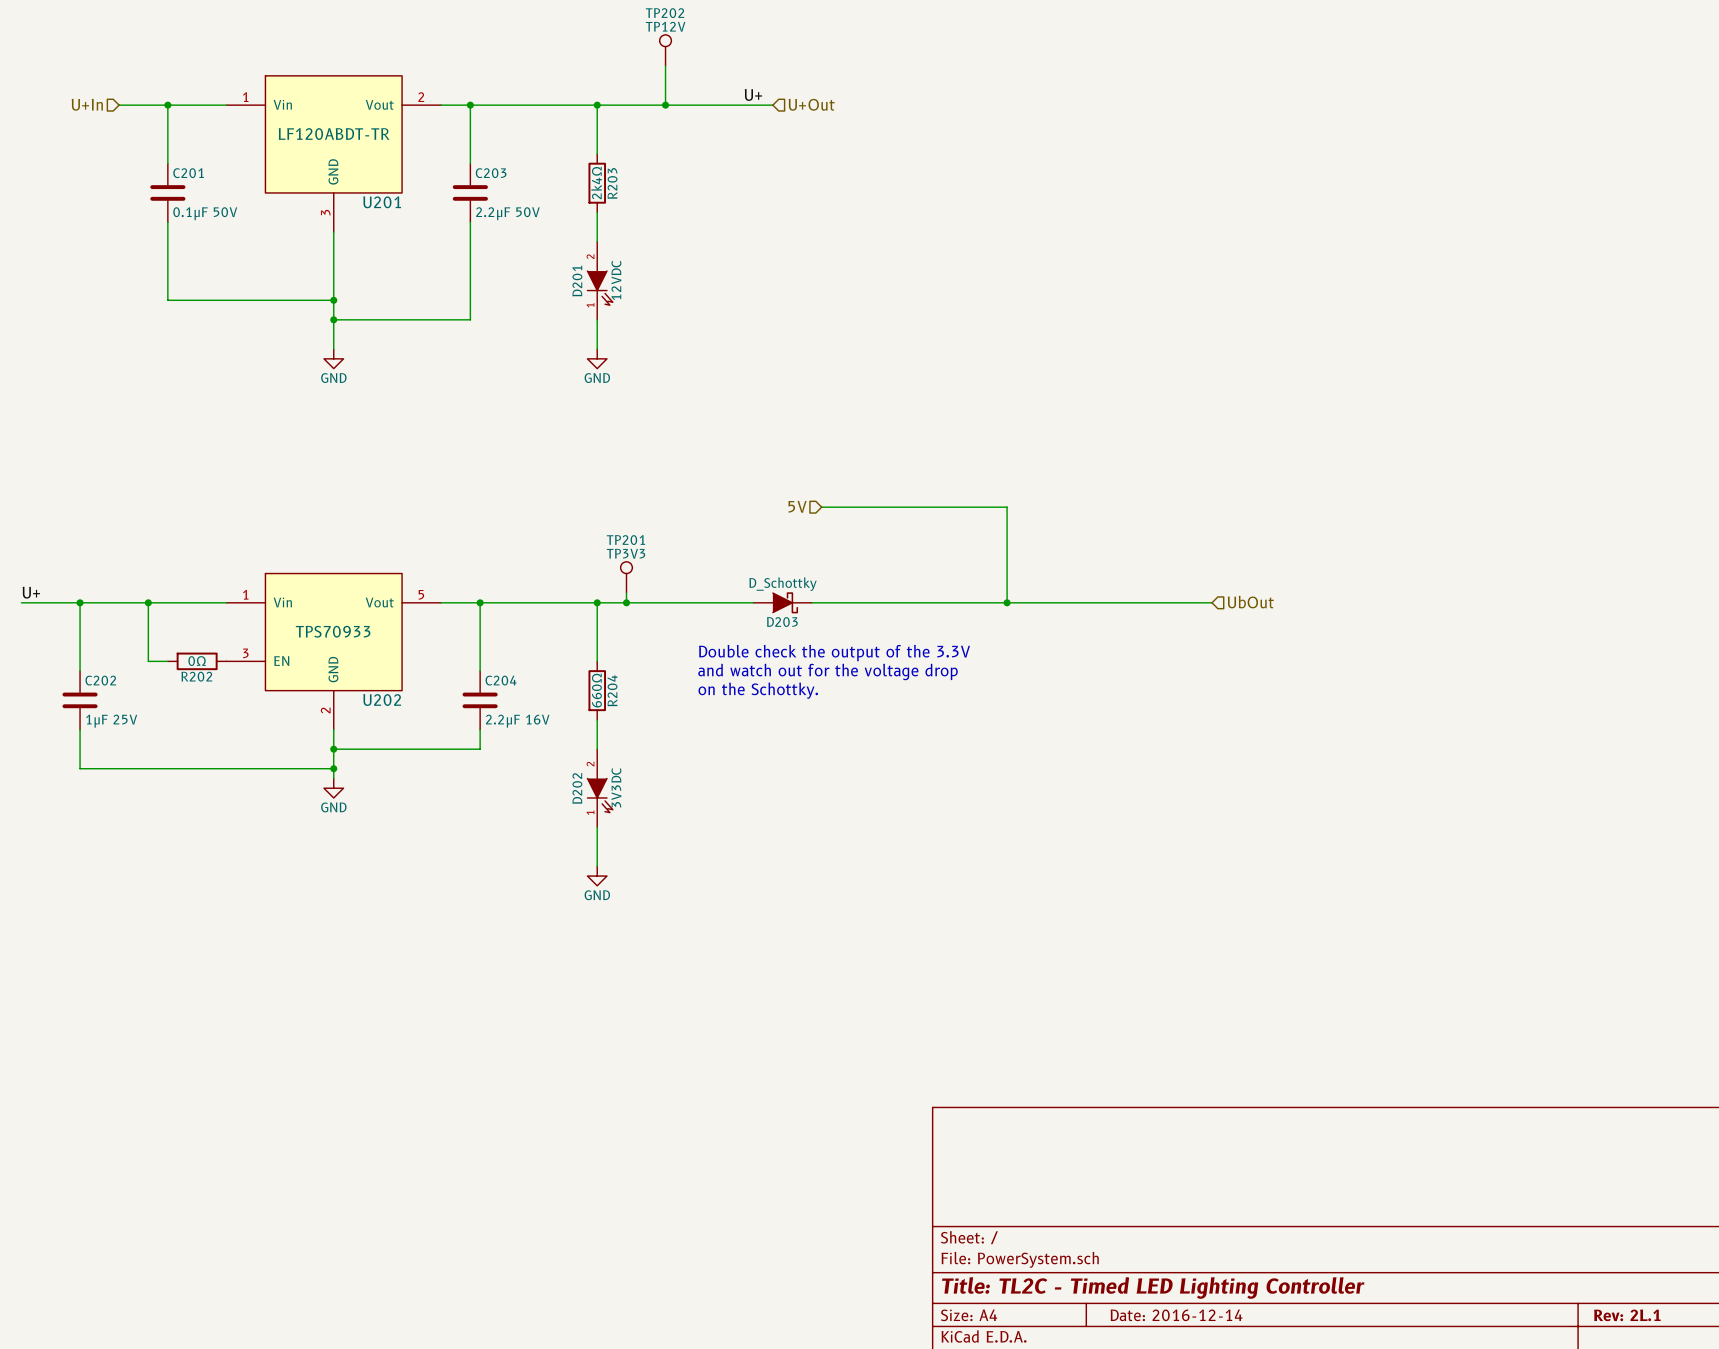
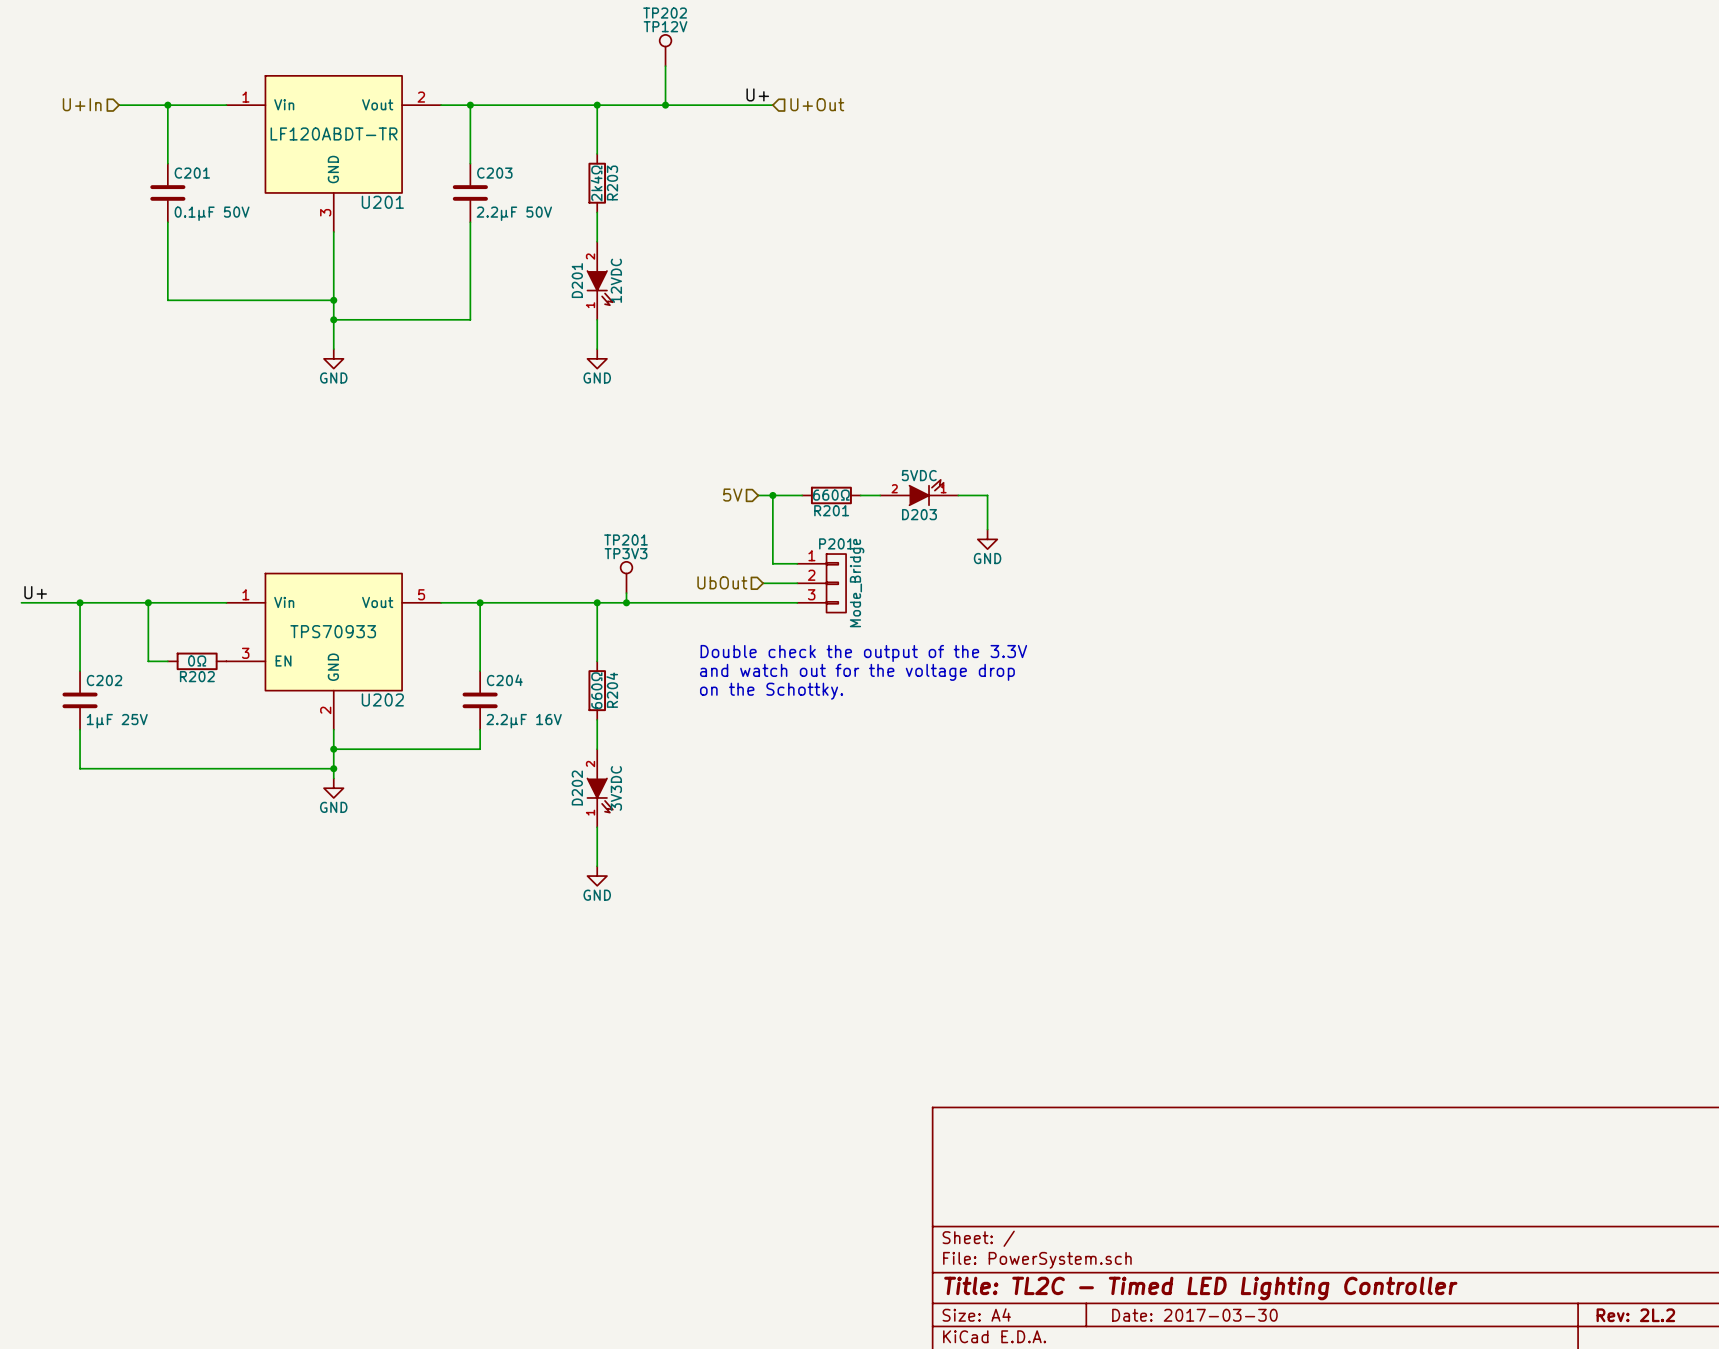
wire: none -> (758, 495) (802, 495)
wire: none -> (772, 495) (772, 563) (797, 563)
junction: none -> (772, 495)
R201: none -> 660Ω (831, 495)
wire: none -> (860, 495) (880, 495)
wire: none -> (958, 495) (987, 495) (987, 529)
hierarchical label position: 5V (797, 506) -> 5V (732, 495)
wire: (821, 507) (1007, 507) (1007, 602) -> none
power symbol: none -> GND (987, 539)
hierarchical label: none -> UbOut (722, 582)
wire: none -> (763, 583) (797, 583)
P201: none -> Mode_Bridge (821, 583)
D203 value: D_Schottky (783, 584) -> 5VDC (919, 475)
D203 symbol: [753, 592, 812, 614] -> [880, 479, 959, 506]
wire: (811, 602) (1212, 602) -> none
junction: (1007, 602) -> none
hierarchical label: UbOut (1250, 602) -> none
title block: Date: 2016-12-14 (1176, 1315) -> Date: 2017-03-30 (1194, 1315)
title block: Rev: 2L.1 (1627, 1315) -> Rev: 2L.2 (1635, 1315)

